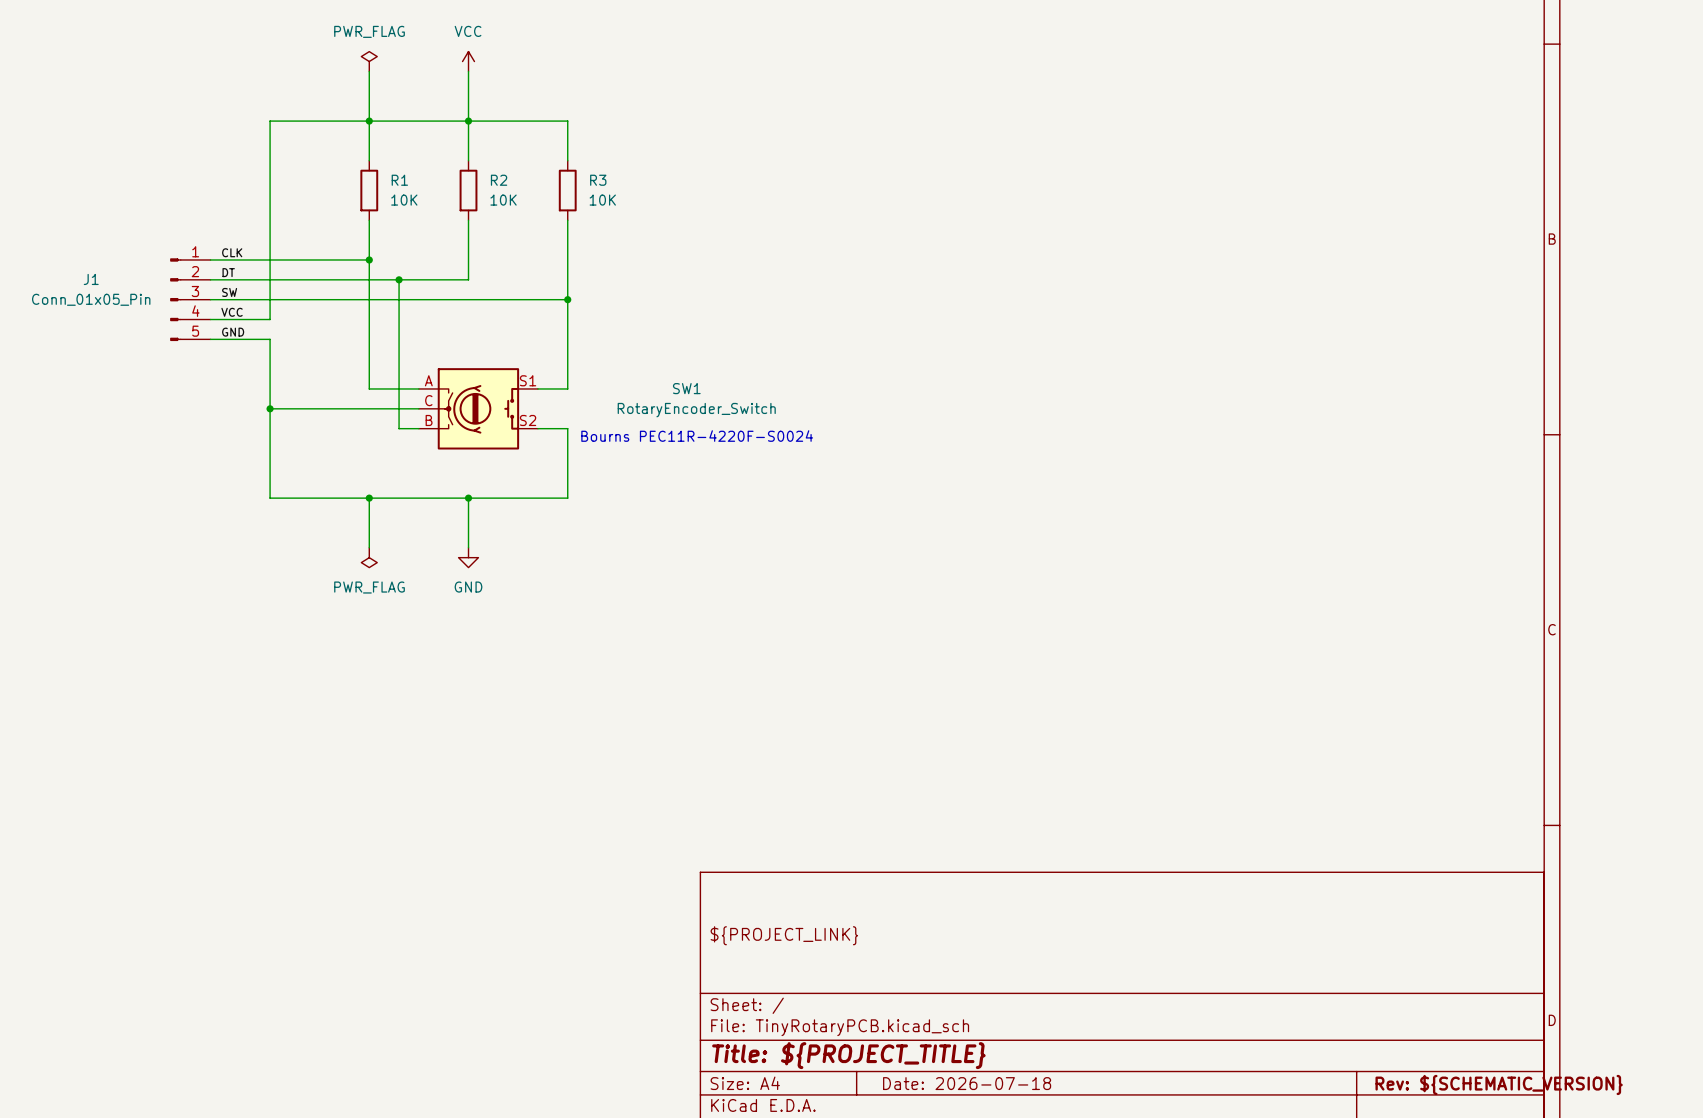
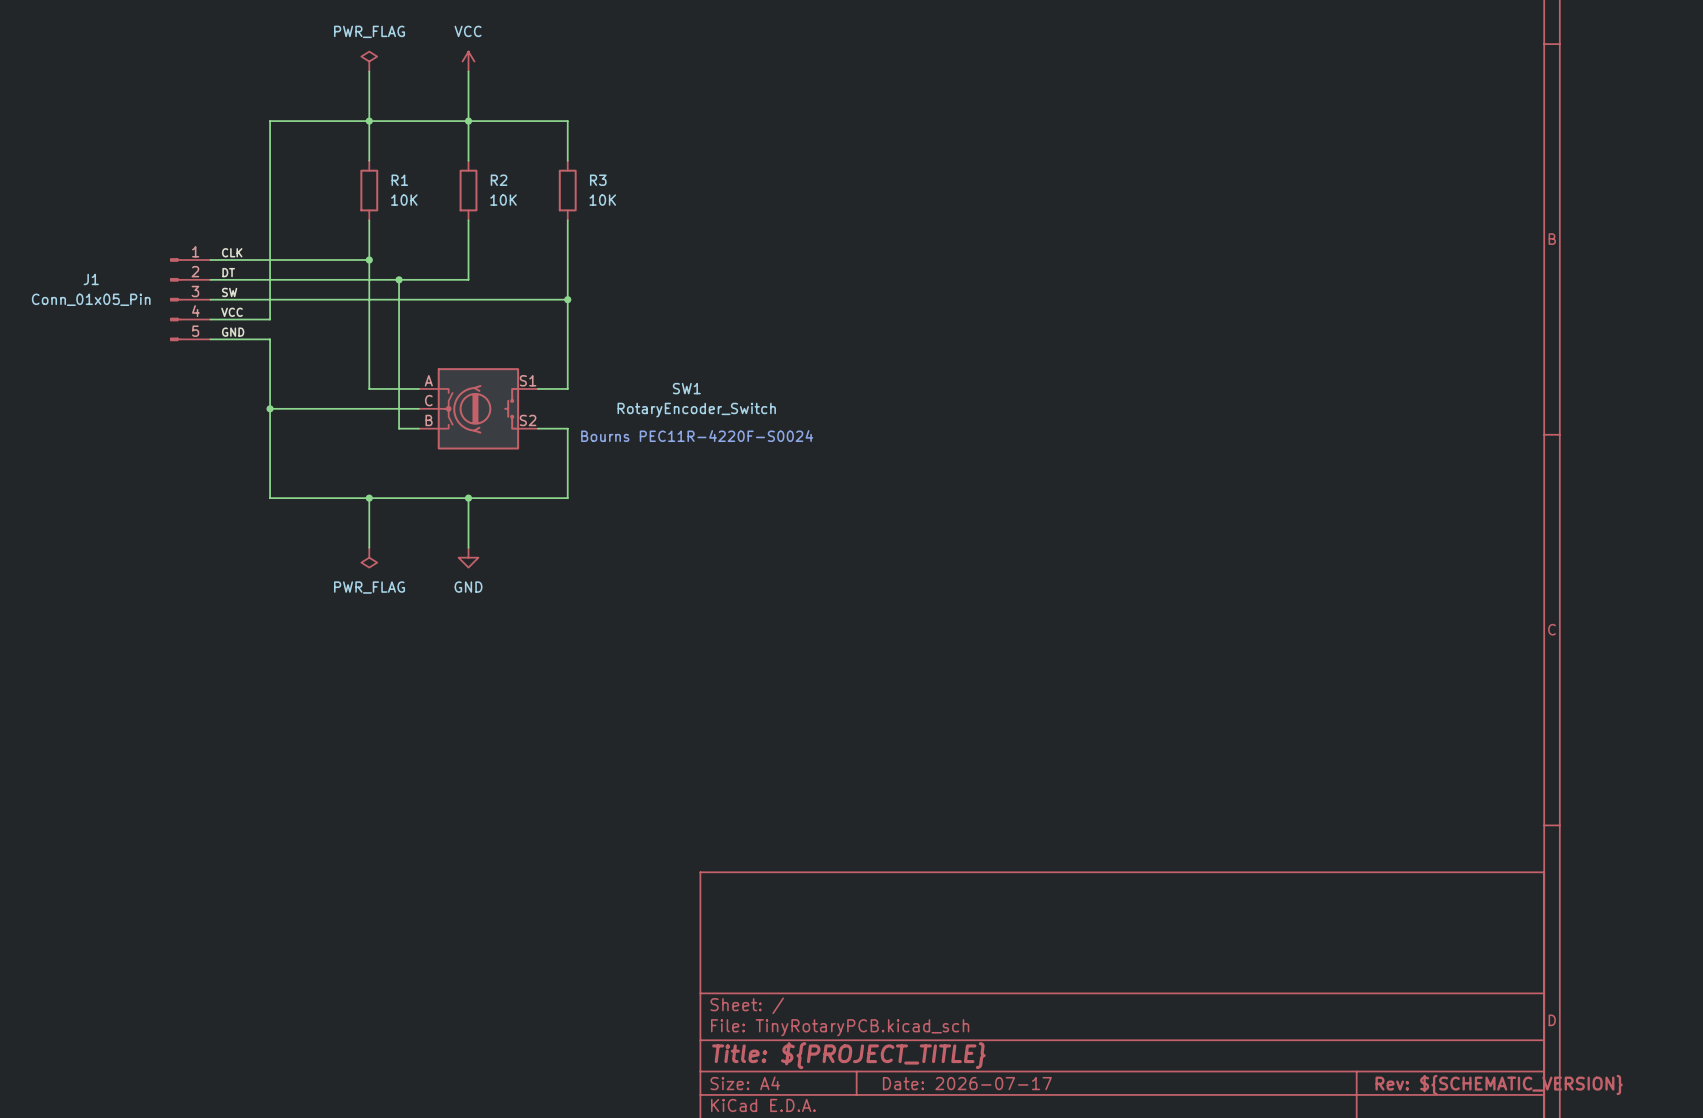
title block: ${PROJECT_LINK} (784, 935) -> none
title block: Date: 2026-07-18 (967, 1083) -> Date: 2026-07-17 (967, 1083)

